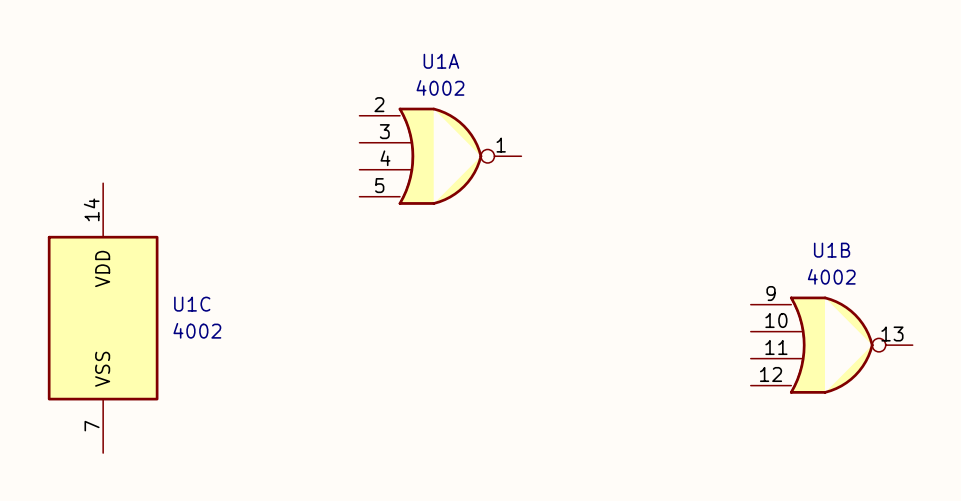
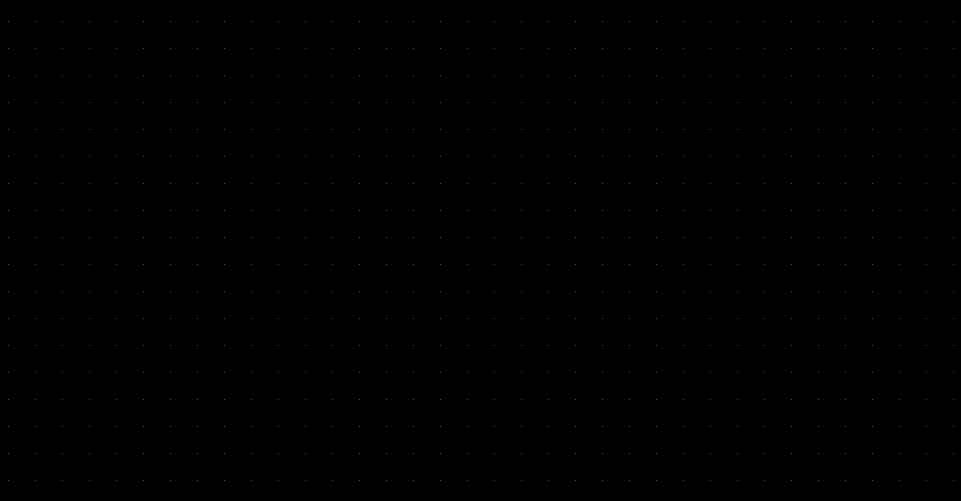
U1A: 4002 (440, 156) -> none
U1C: 4002 (103, 318) -> none
U1B: 4002 (831, 345) -> none

